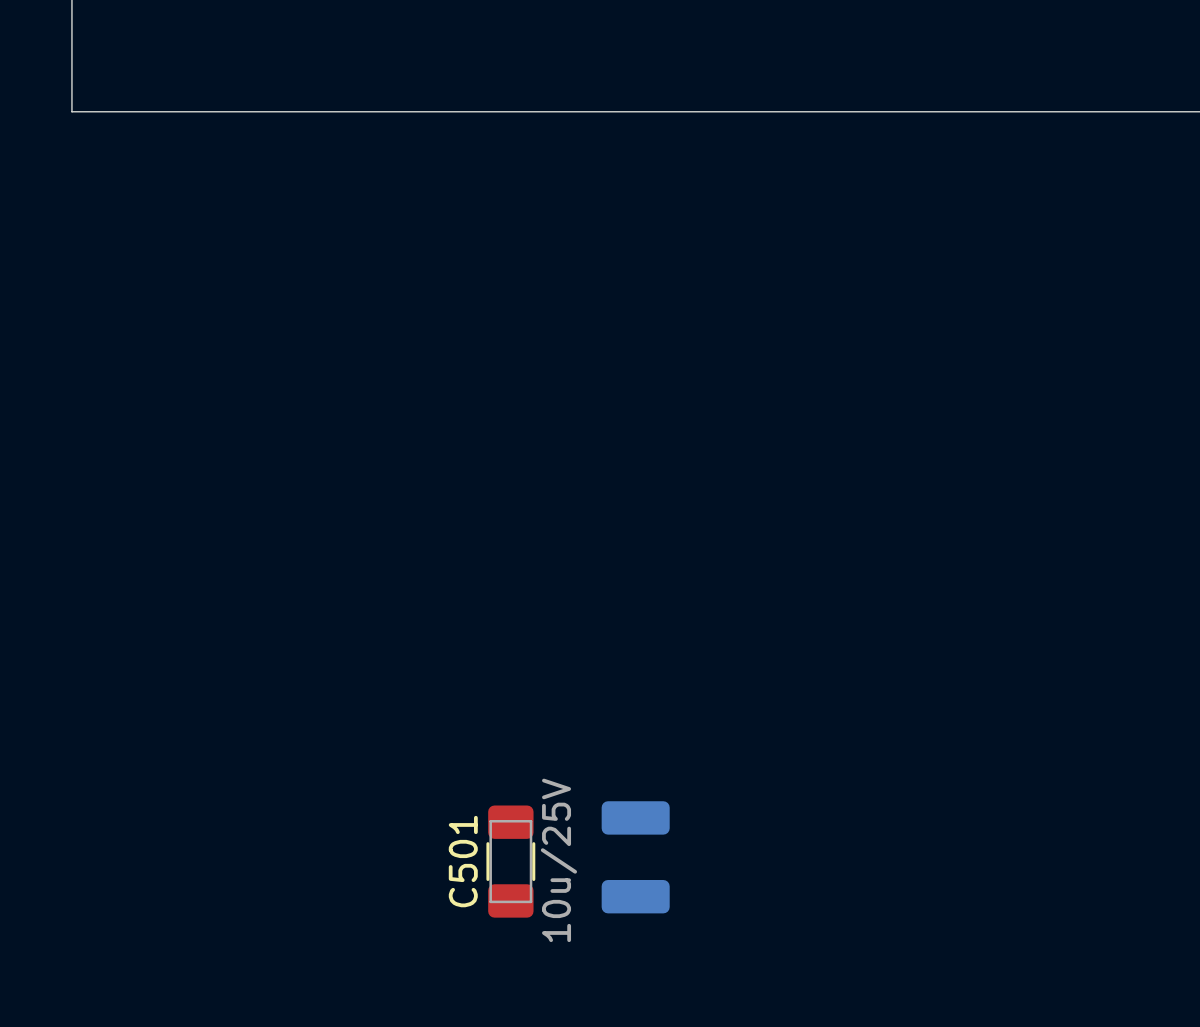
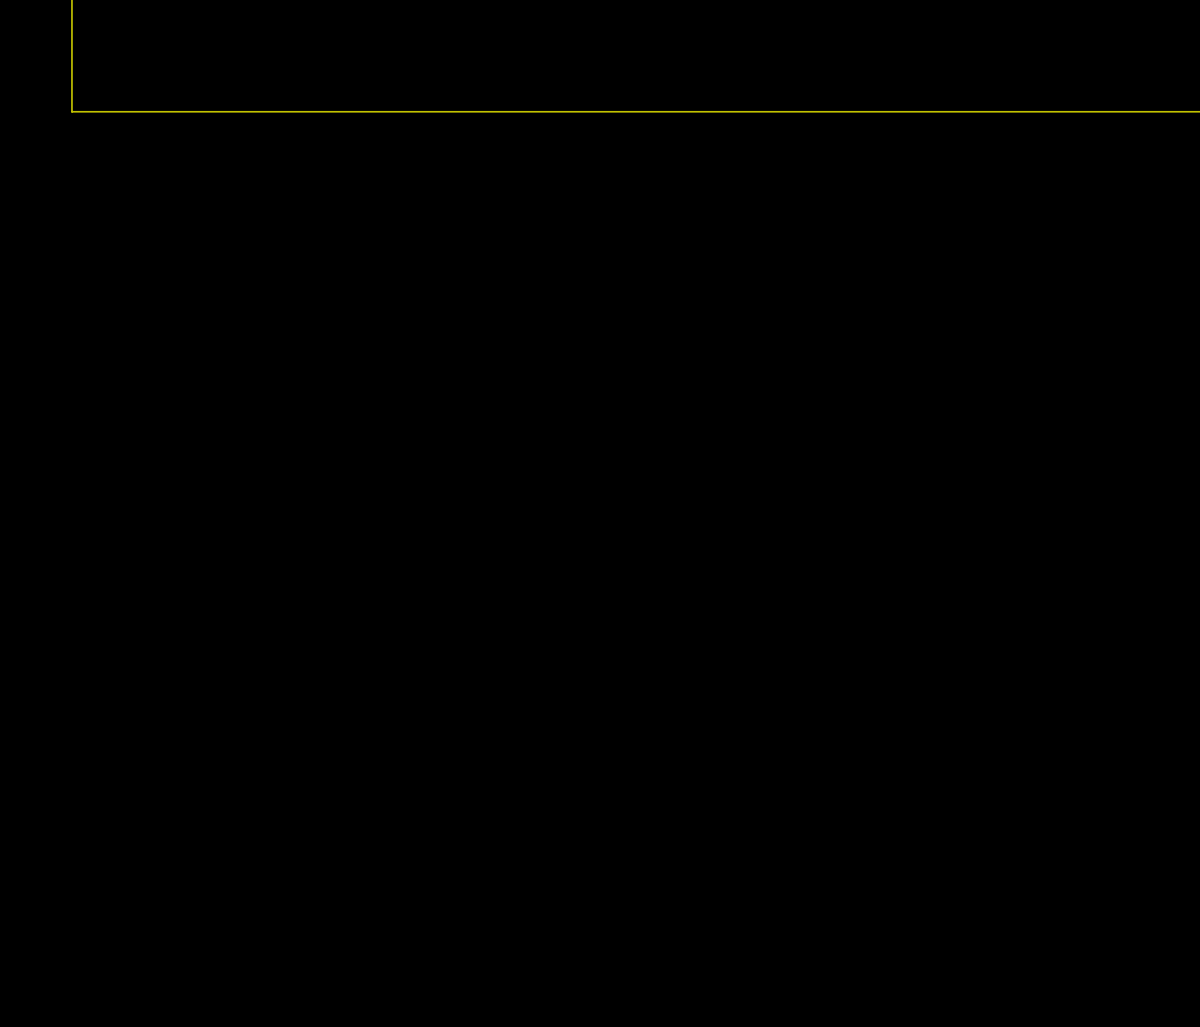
part: (635, 857) -> none
C501: 10u/25V (510, 861) -> none

